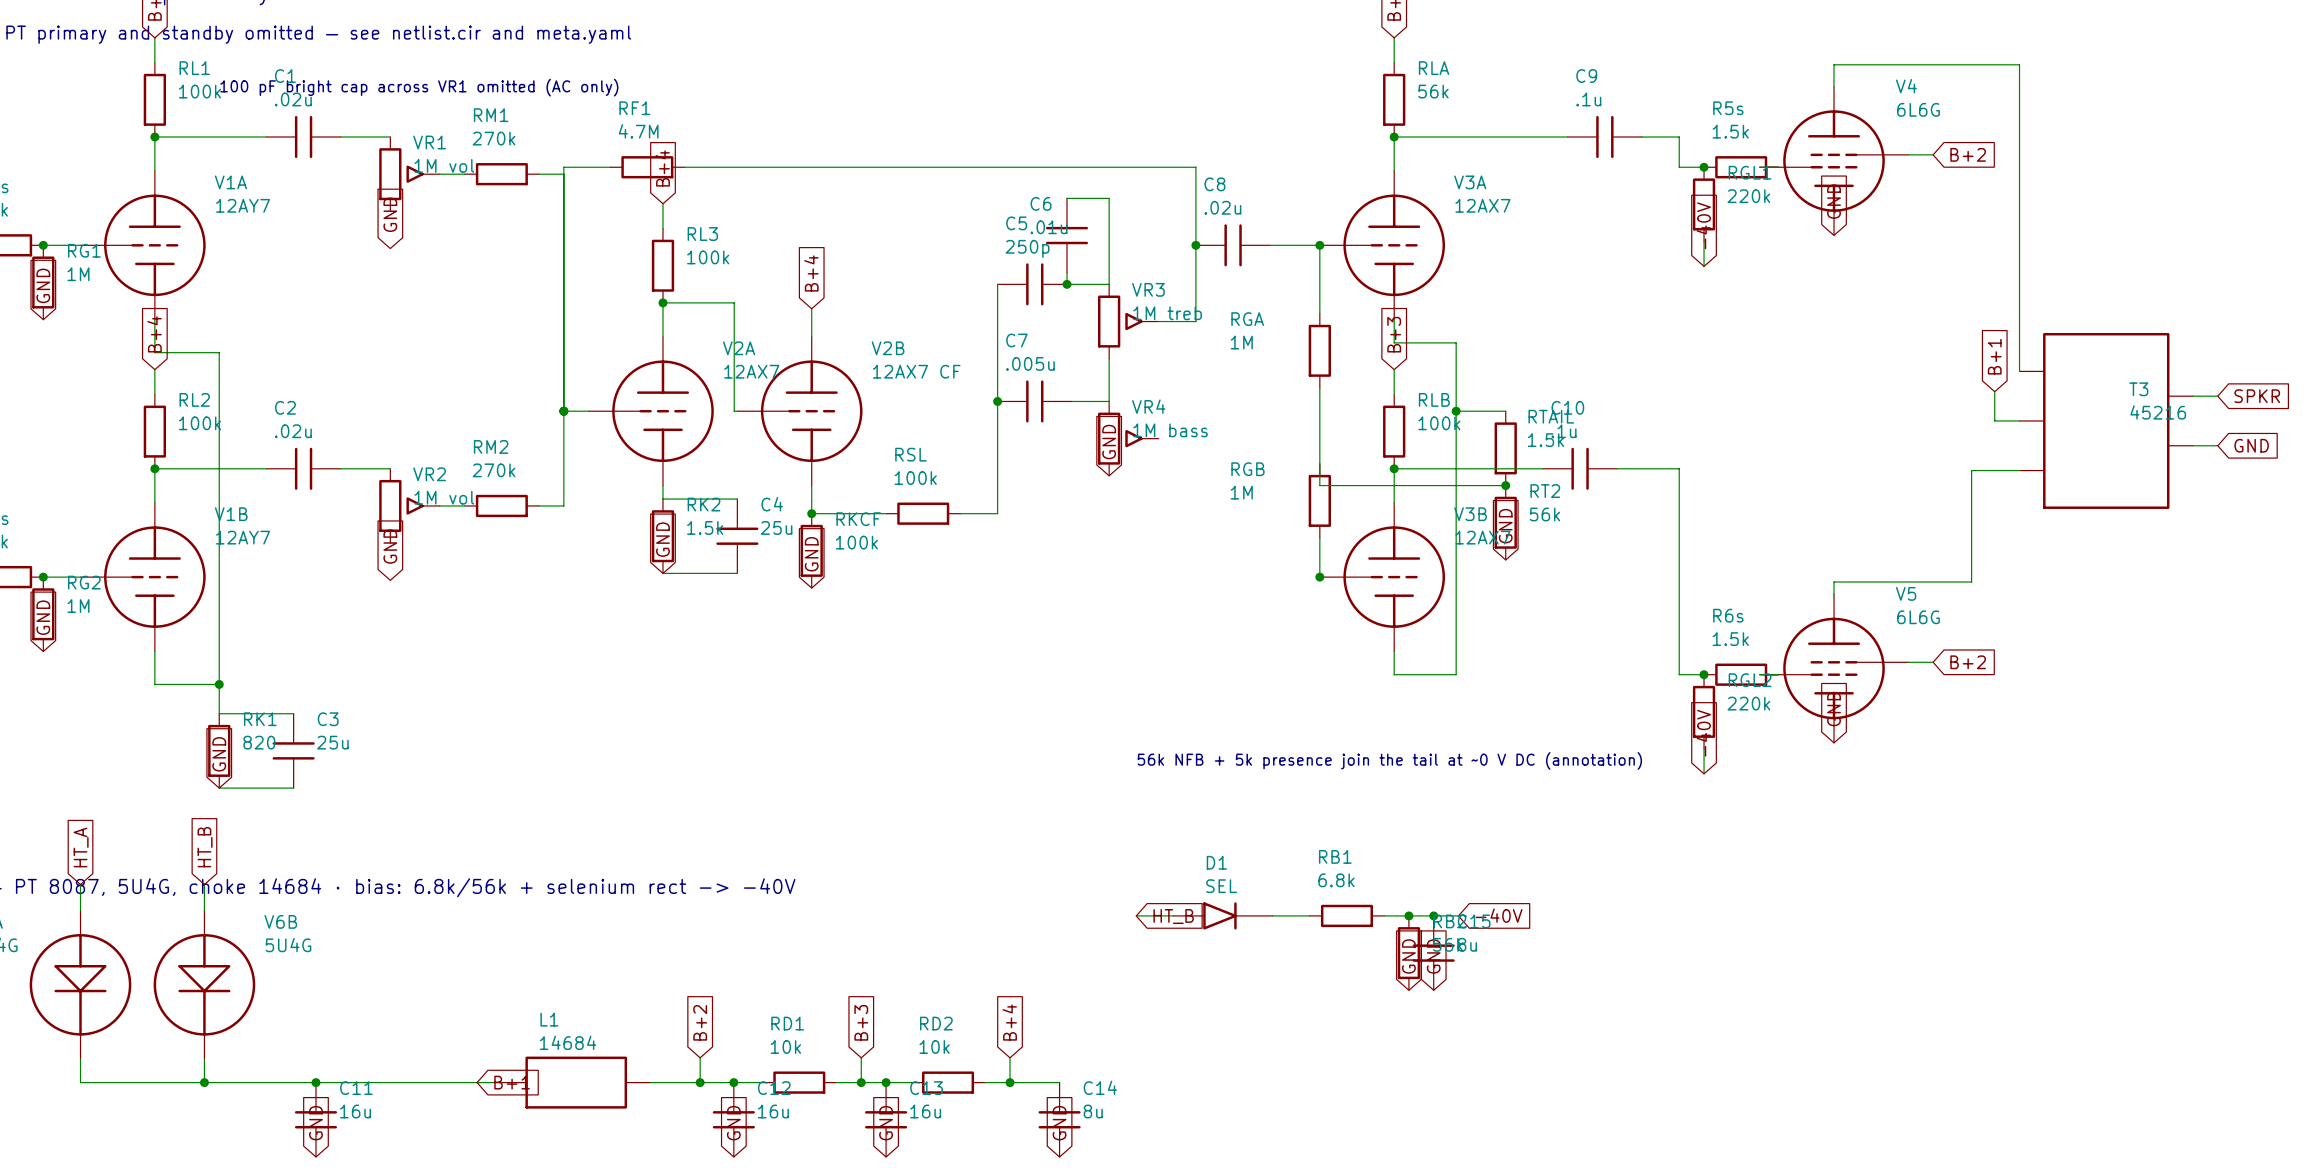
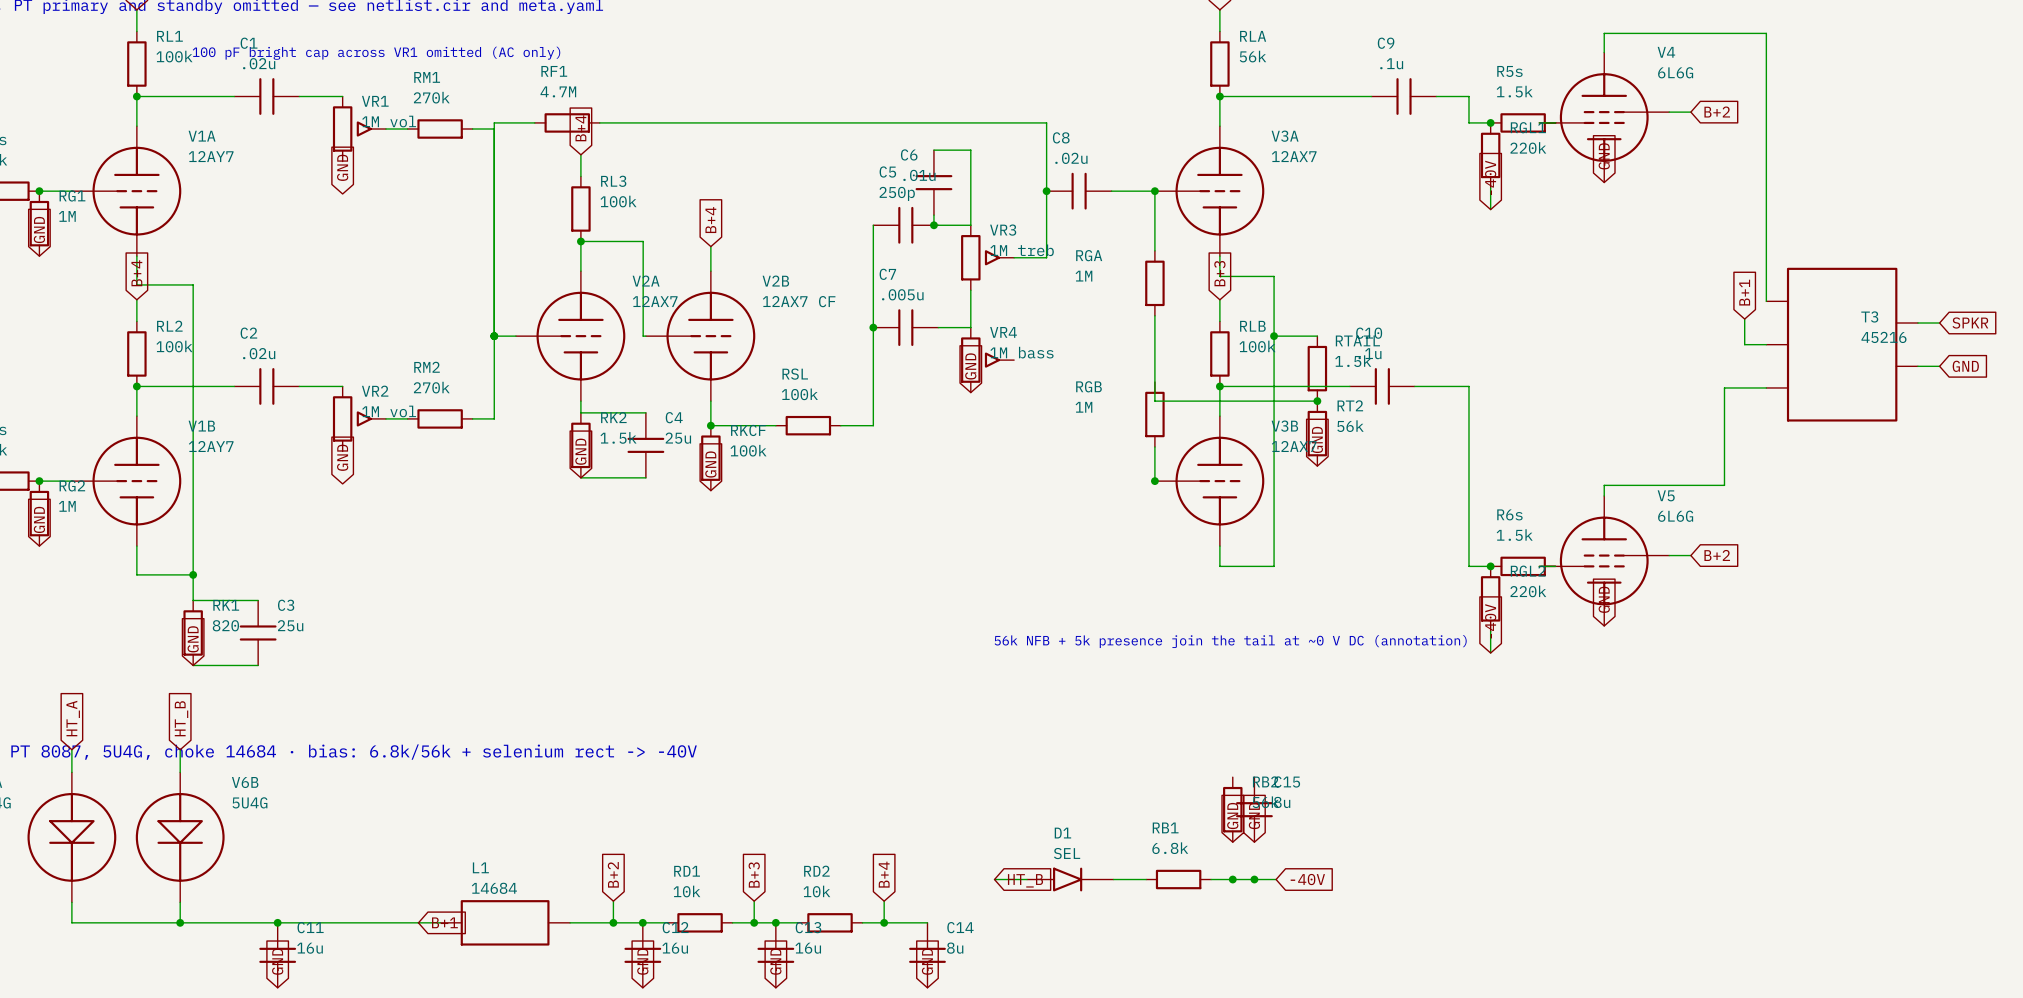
wire: (1136, 915) (1173, 915) -> (994, 879) (1027, 879)
D1 position: (1223, 915) -> (1070, 879)
wire: (1272, 915) (1309, 915) -> (1113, 879) (1146, 879)
RB1 position: (1346, 915) -> (1178, 879)
wire: (1384, 915) (1458, 915) -> (1211, 879) (1276, 879)
junction: (1408, 915) -> none
junction: (1433, 915) -> none
global label position: -40V (1499, 915) -> -40V (1307, 879)
global label position: HT_B (1173, 916) -> HT_B (1025, 880)
junction: none -> (1232, 879)
junction: none -> (1254, 879)

